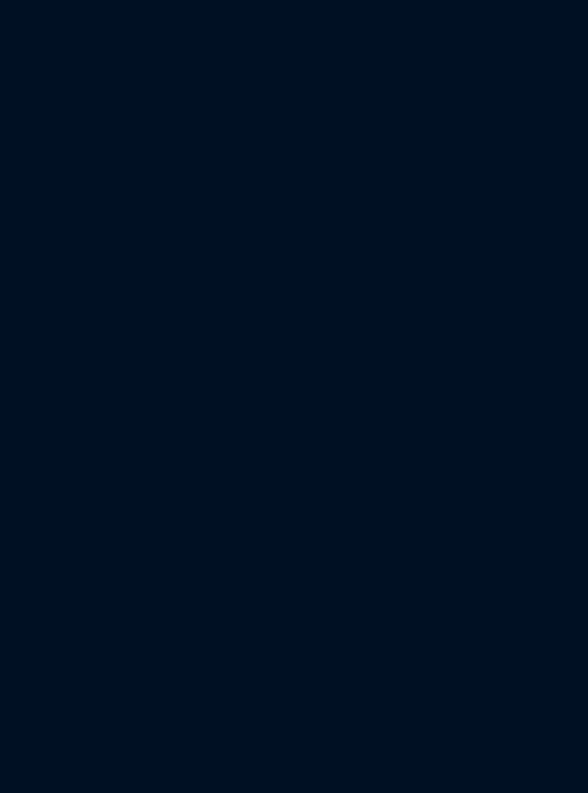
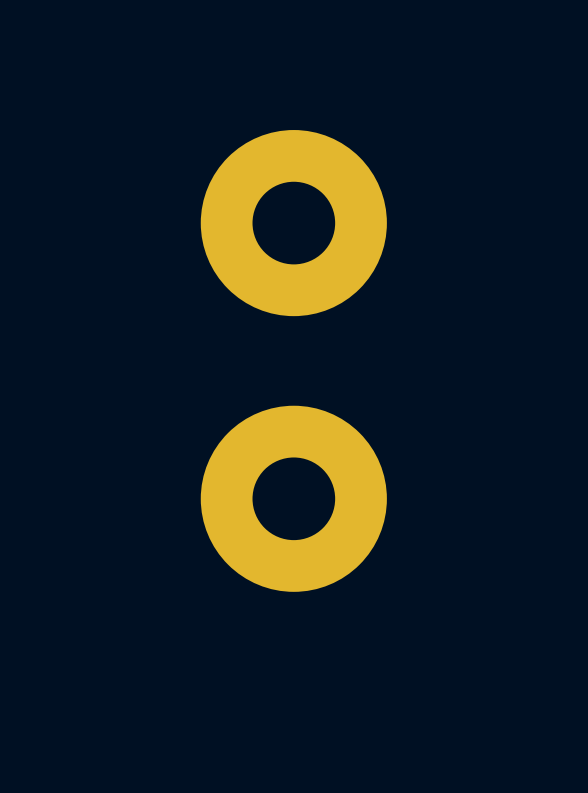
part: none -> (293, 360)

